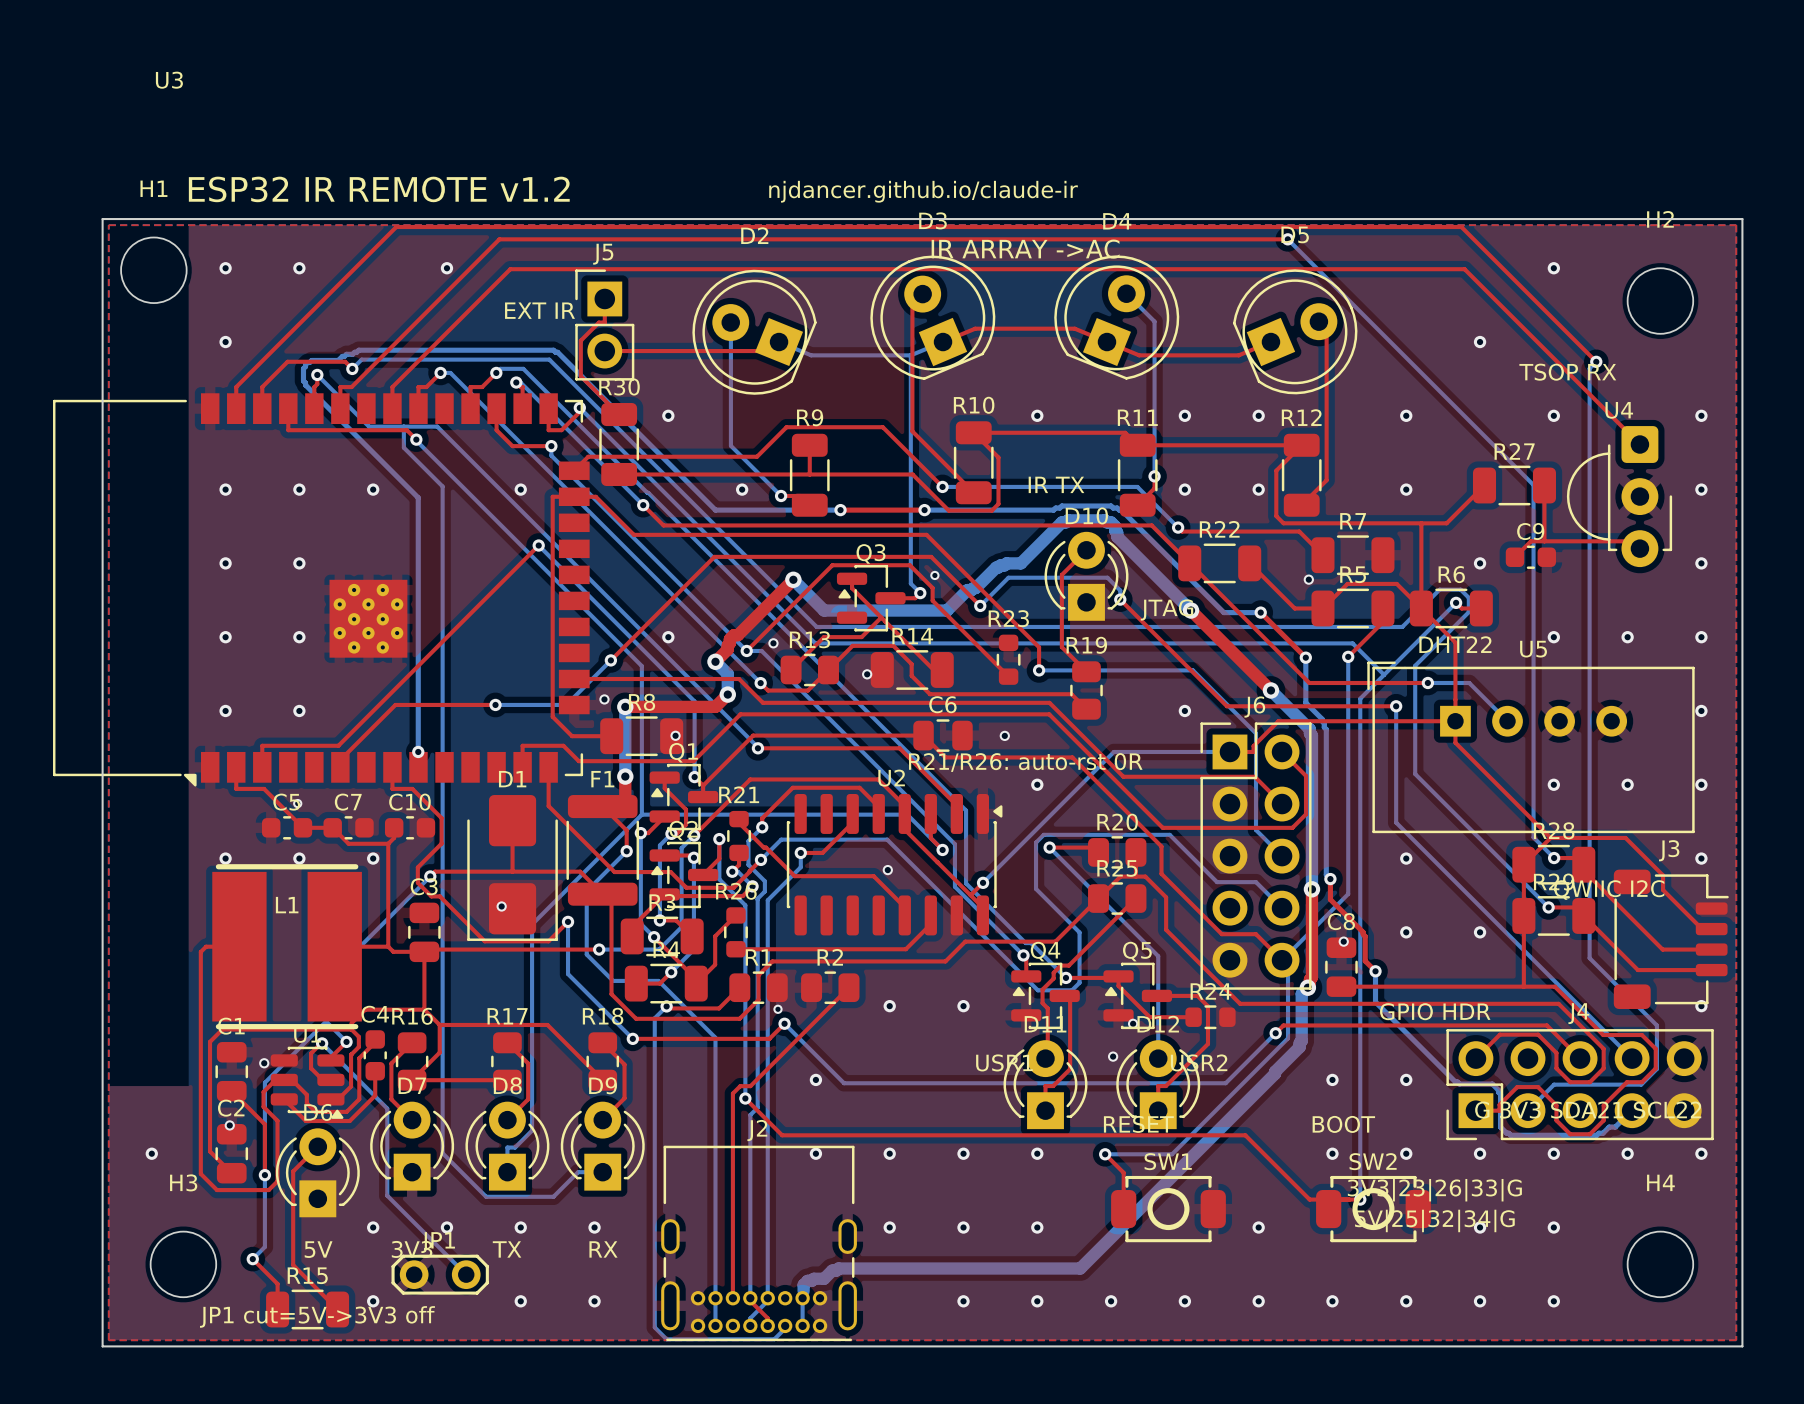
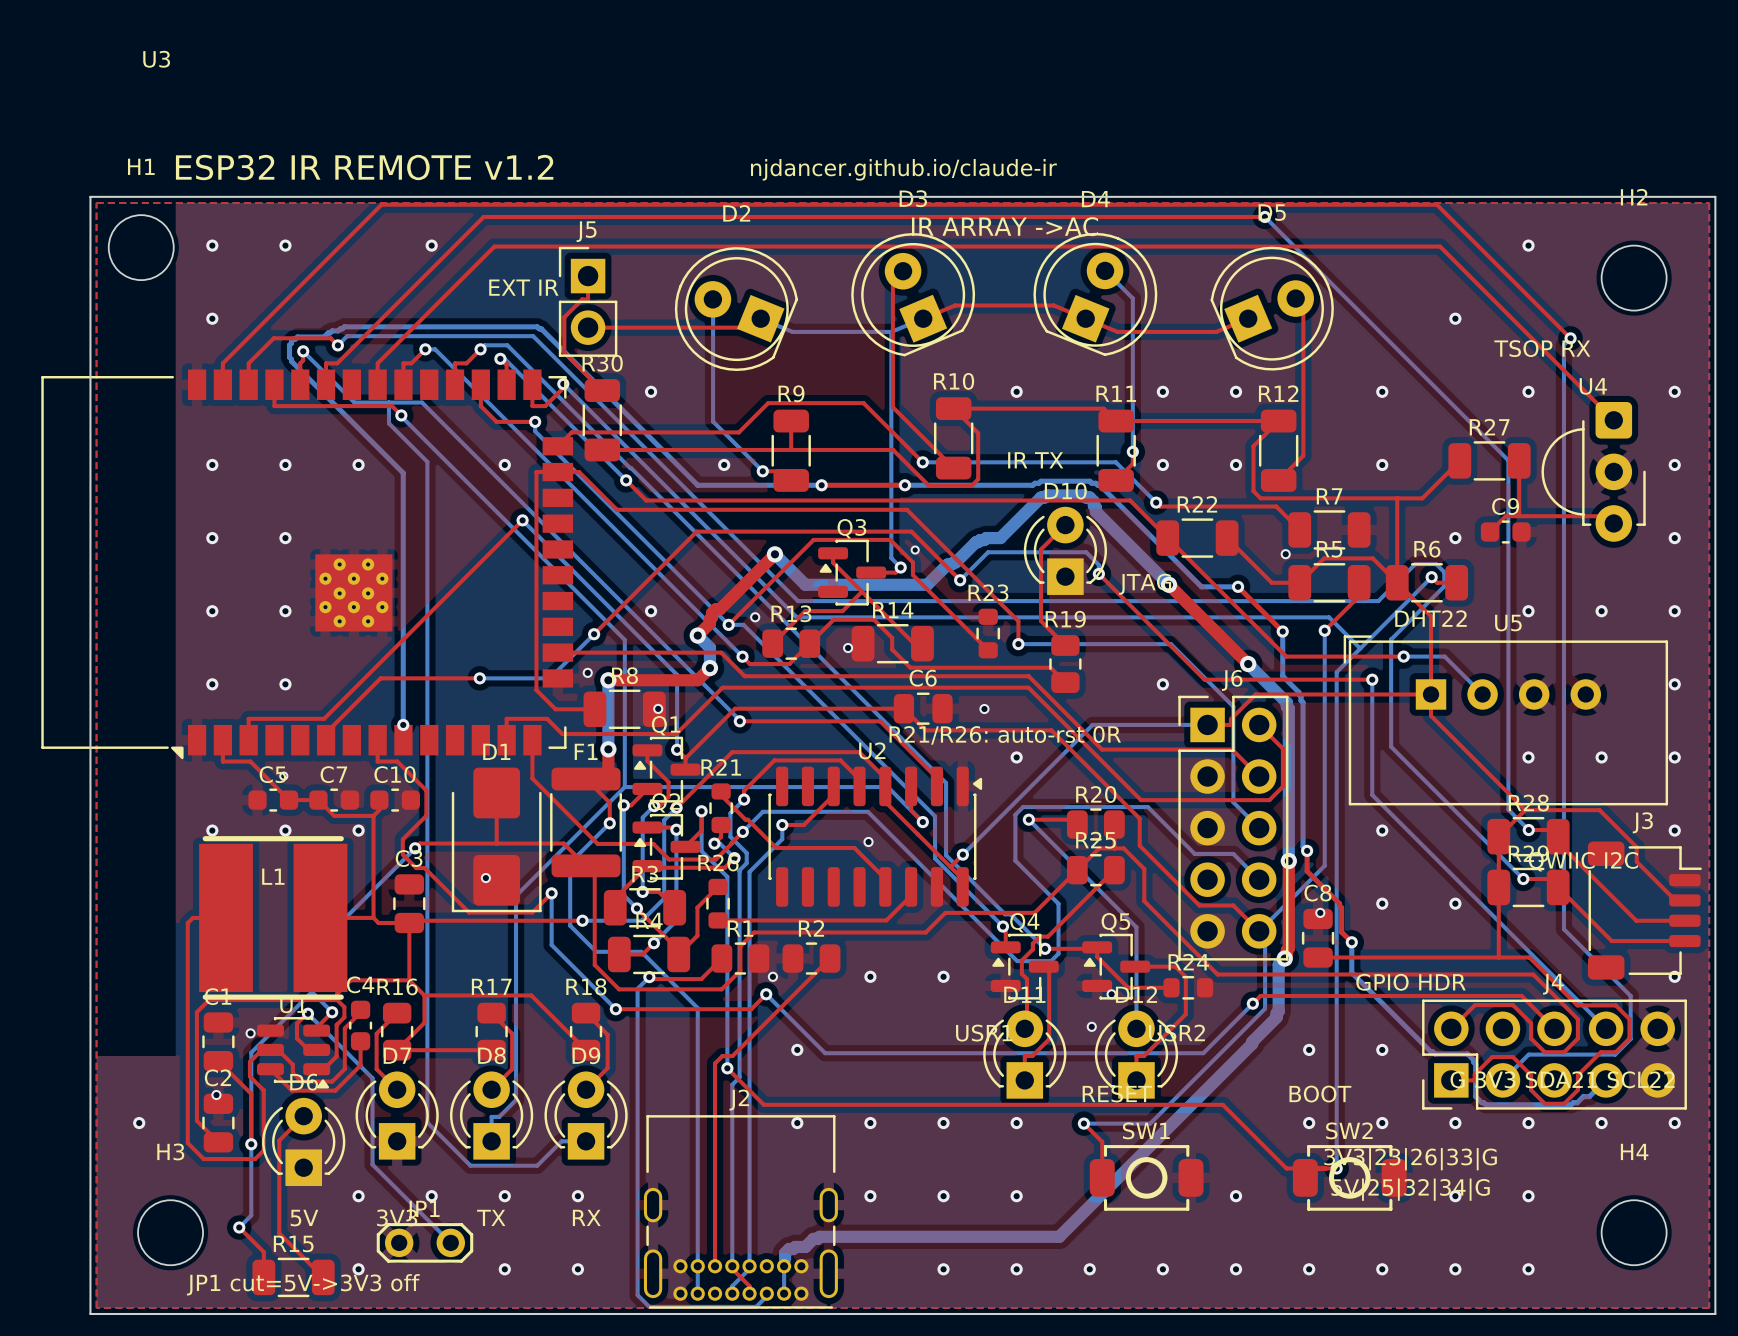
via: none -> (772, 976)
via: (777, 1009) -> none

